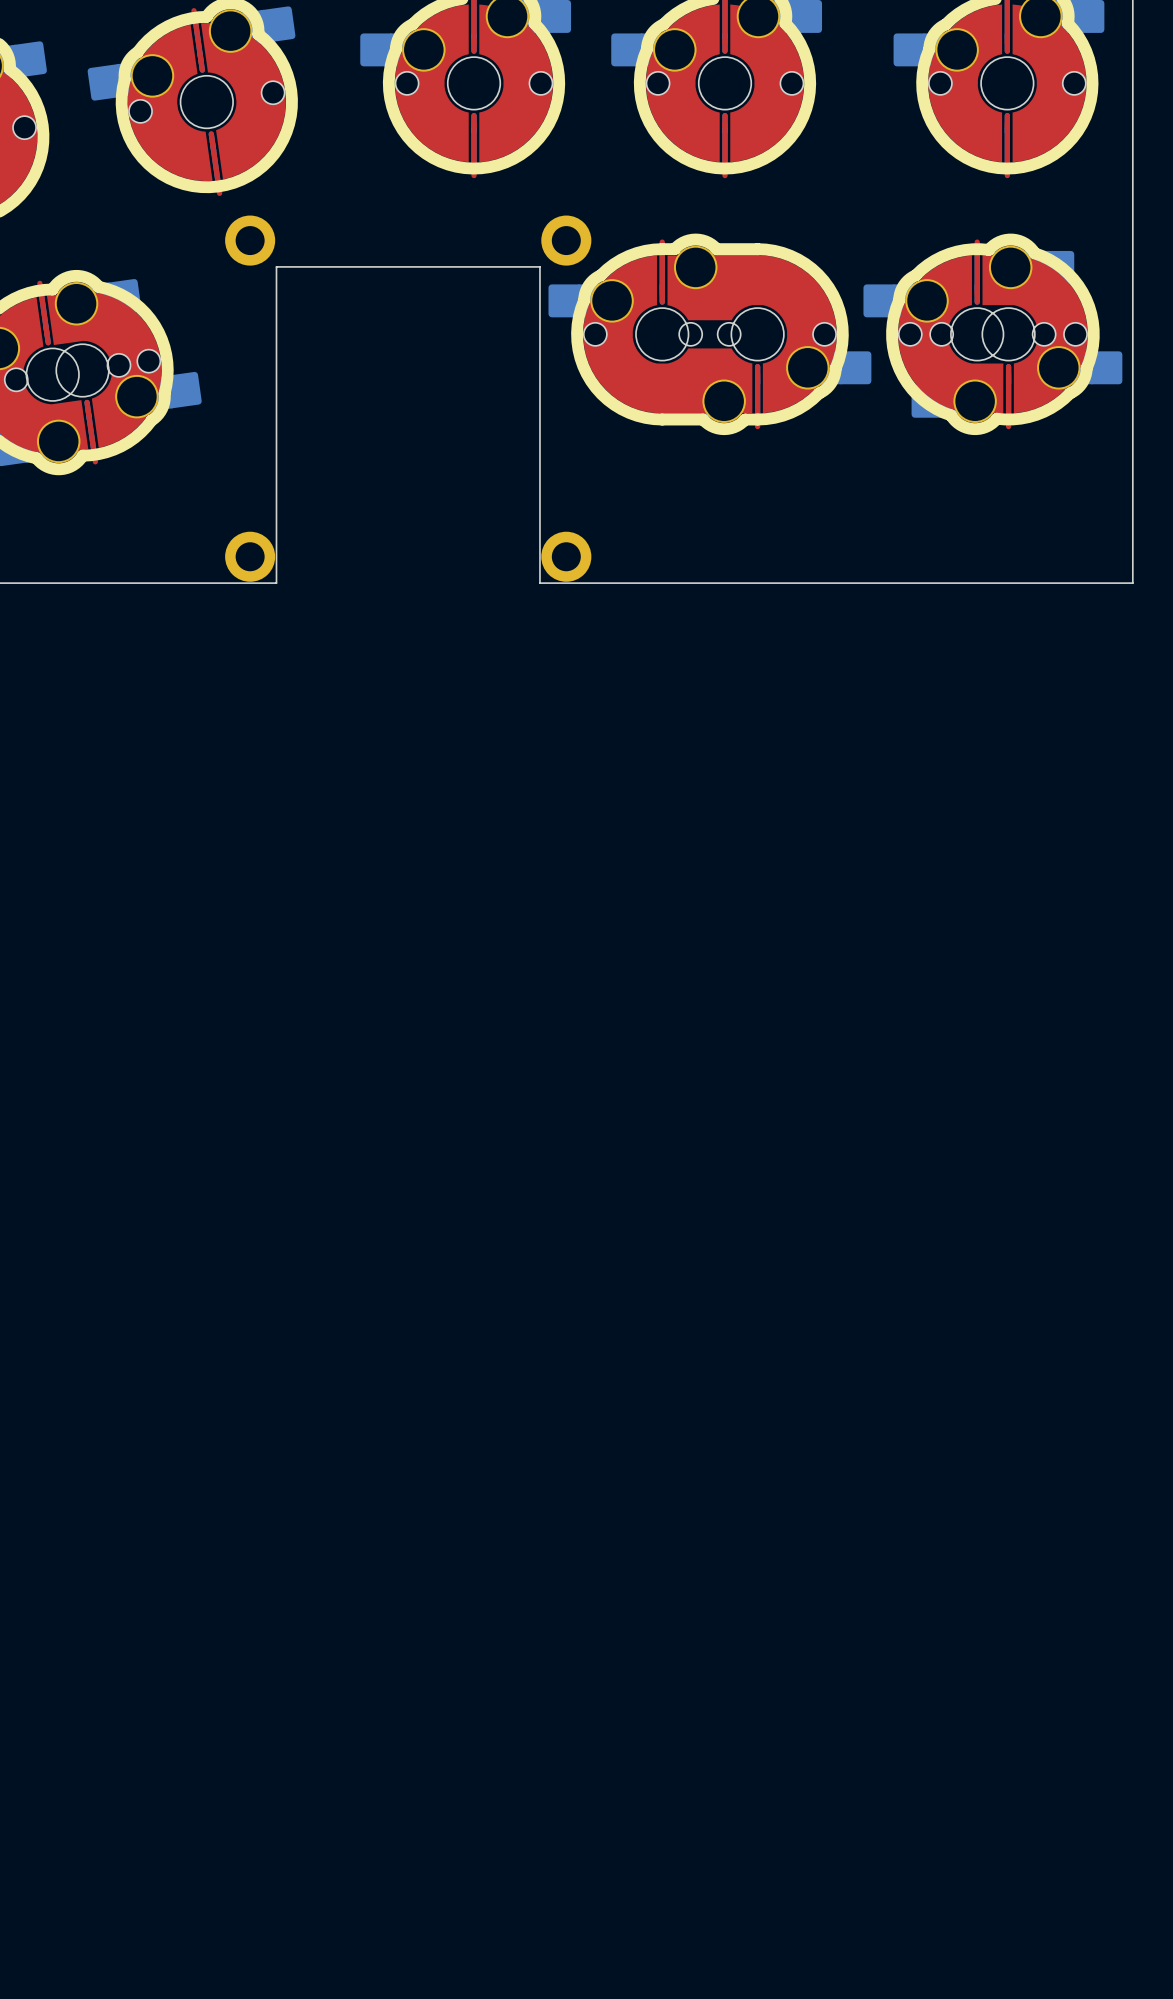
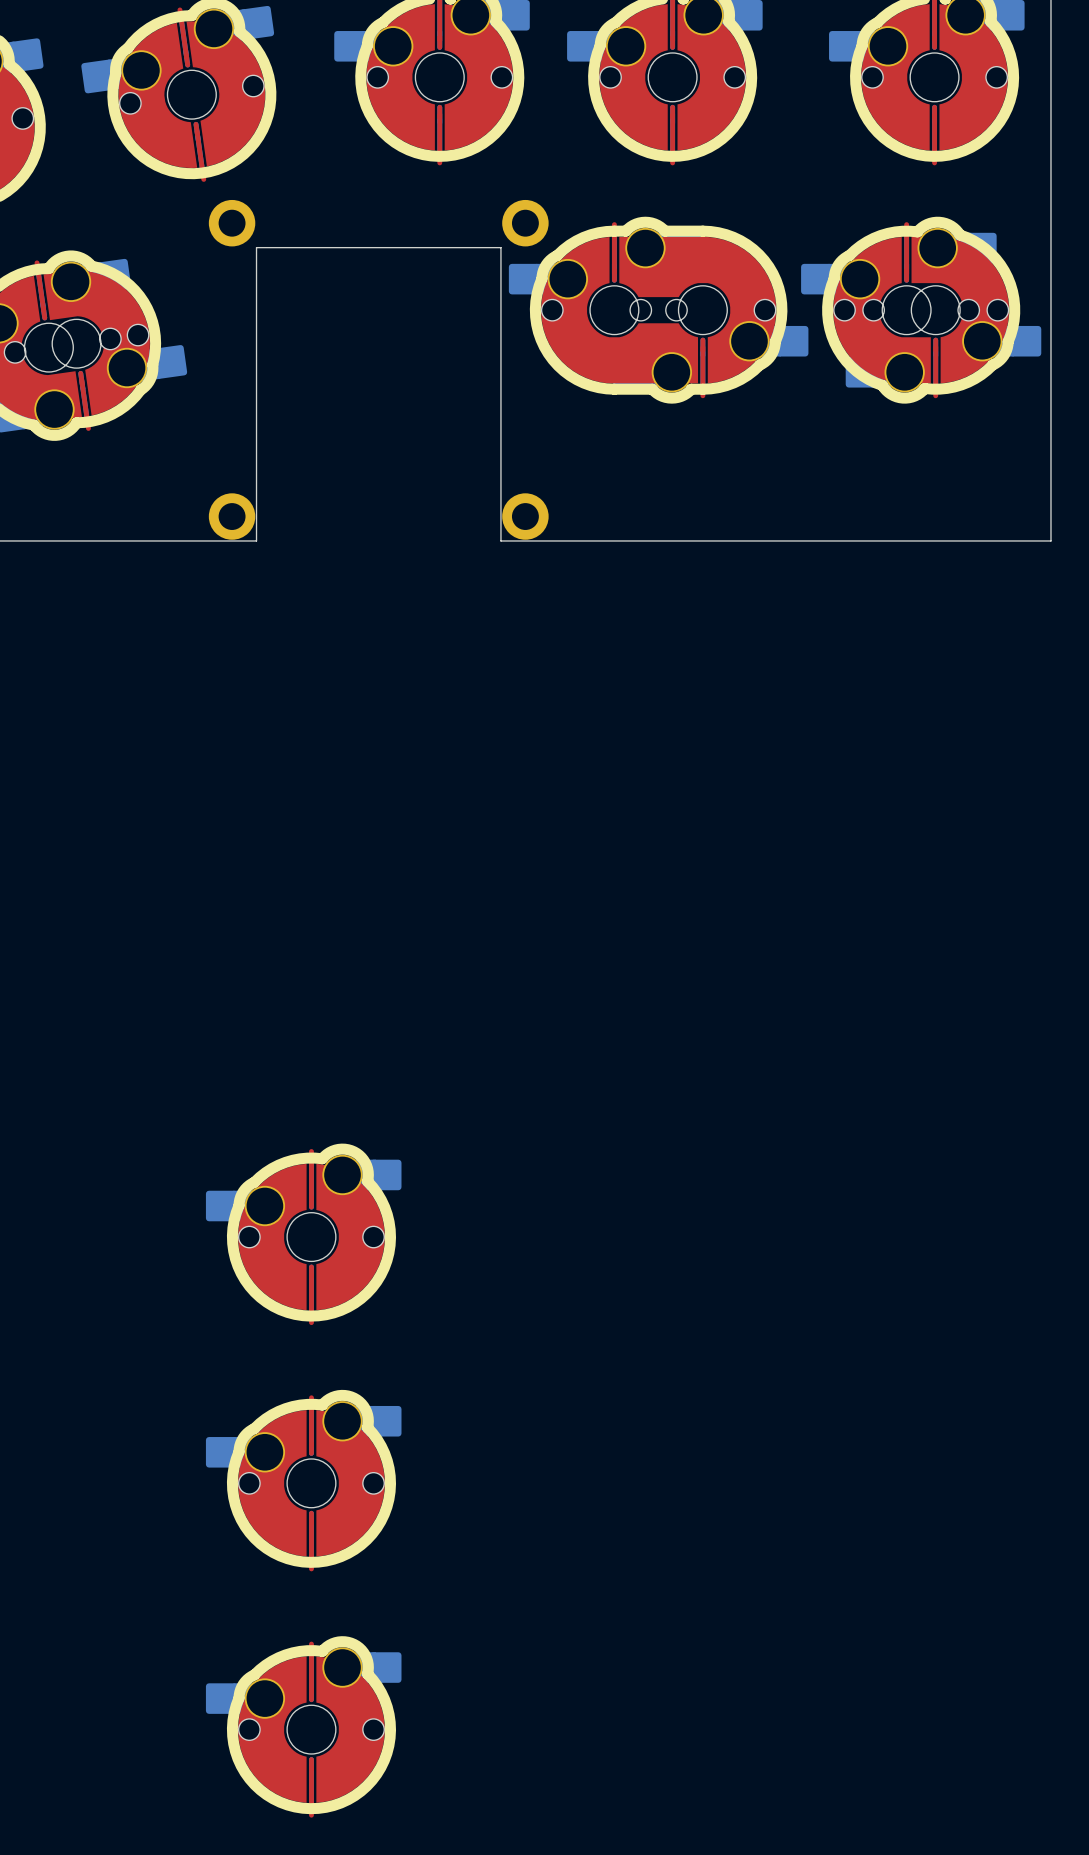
part: none -> (303, 1234)
part: none -> (303, 1480)
part: none -> (303, 1726)

